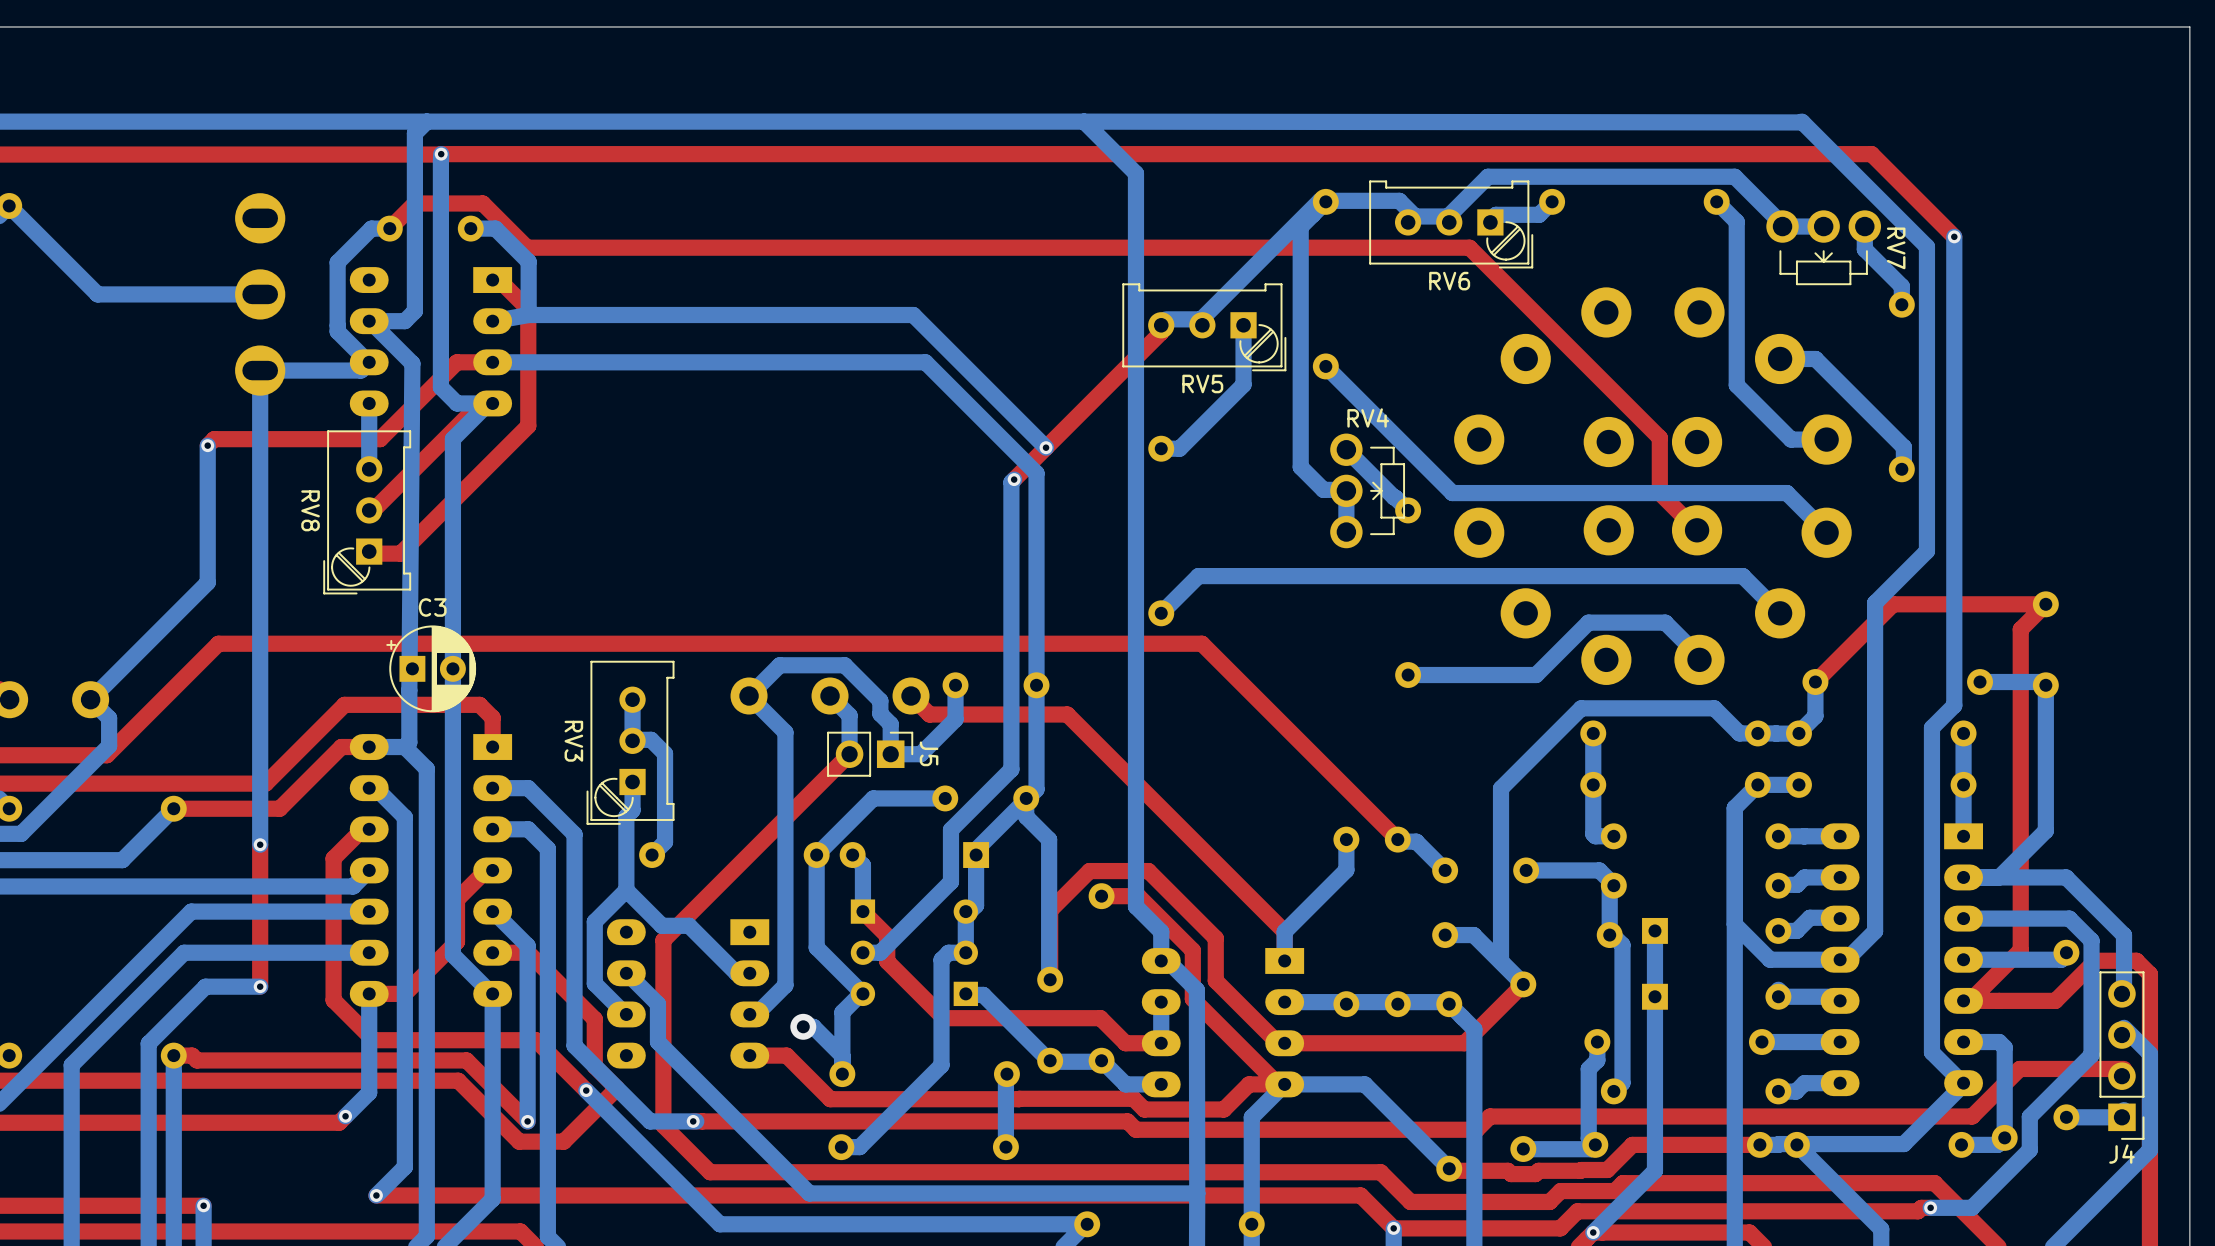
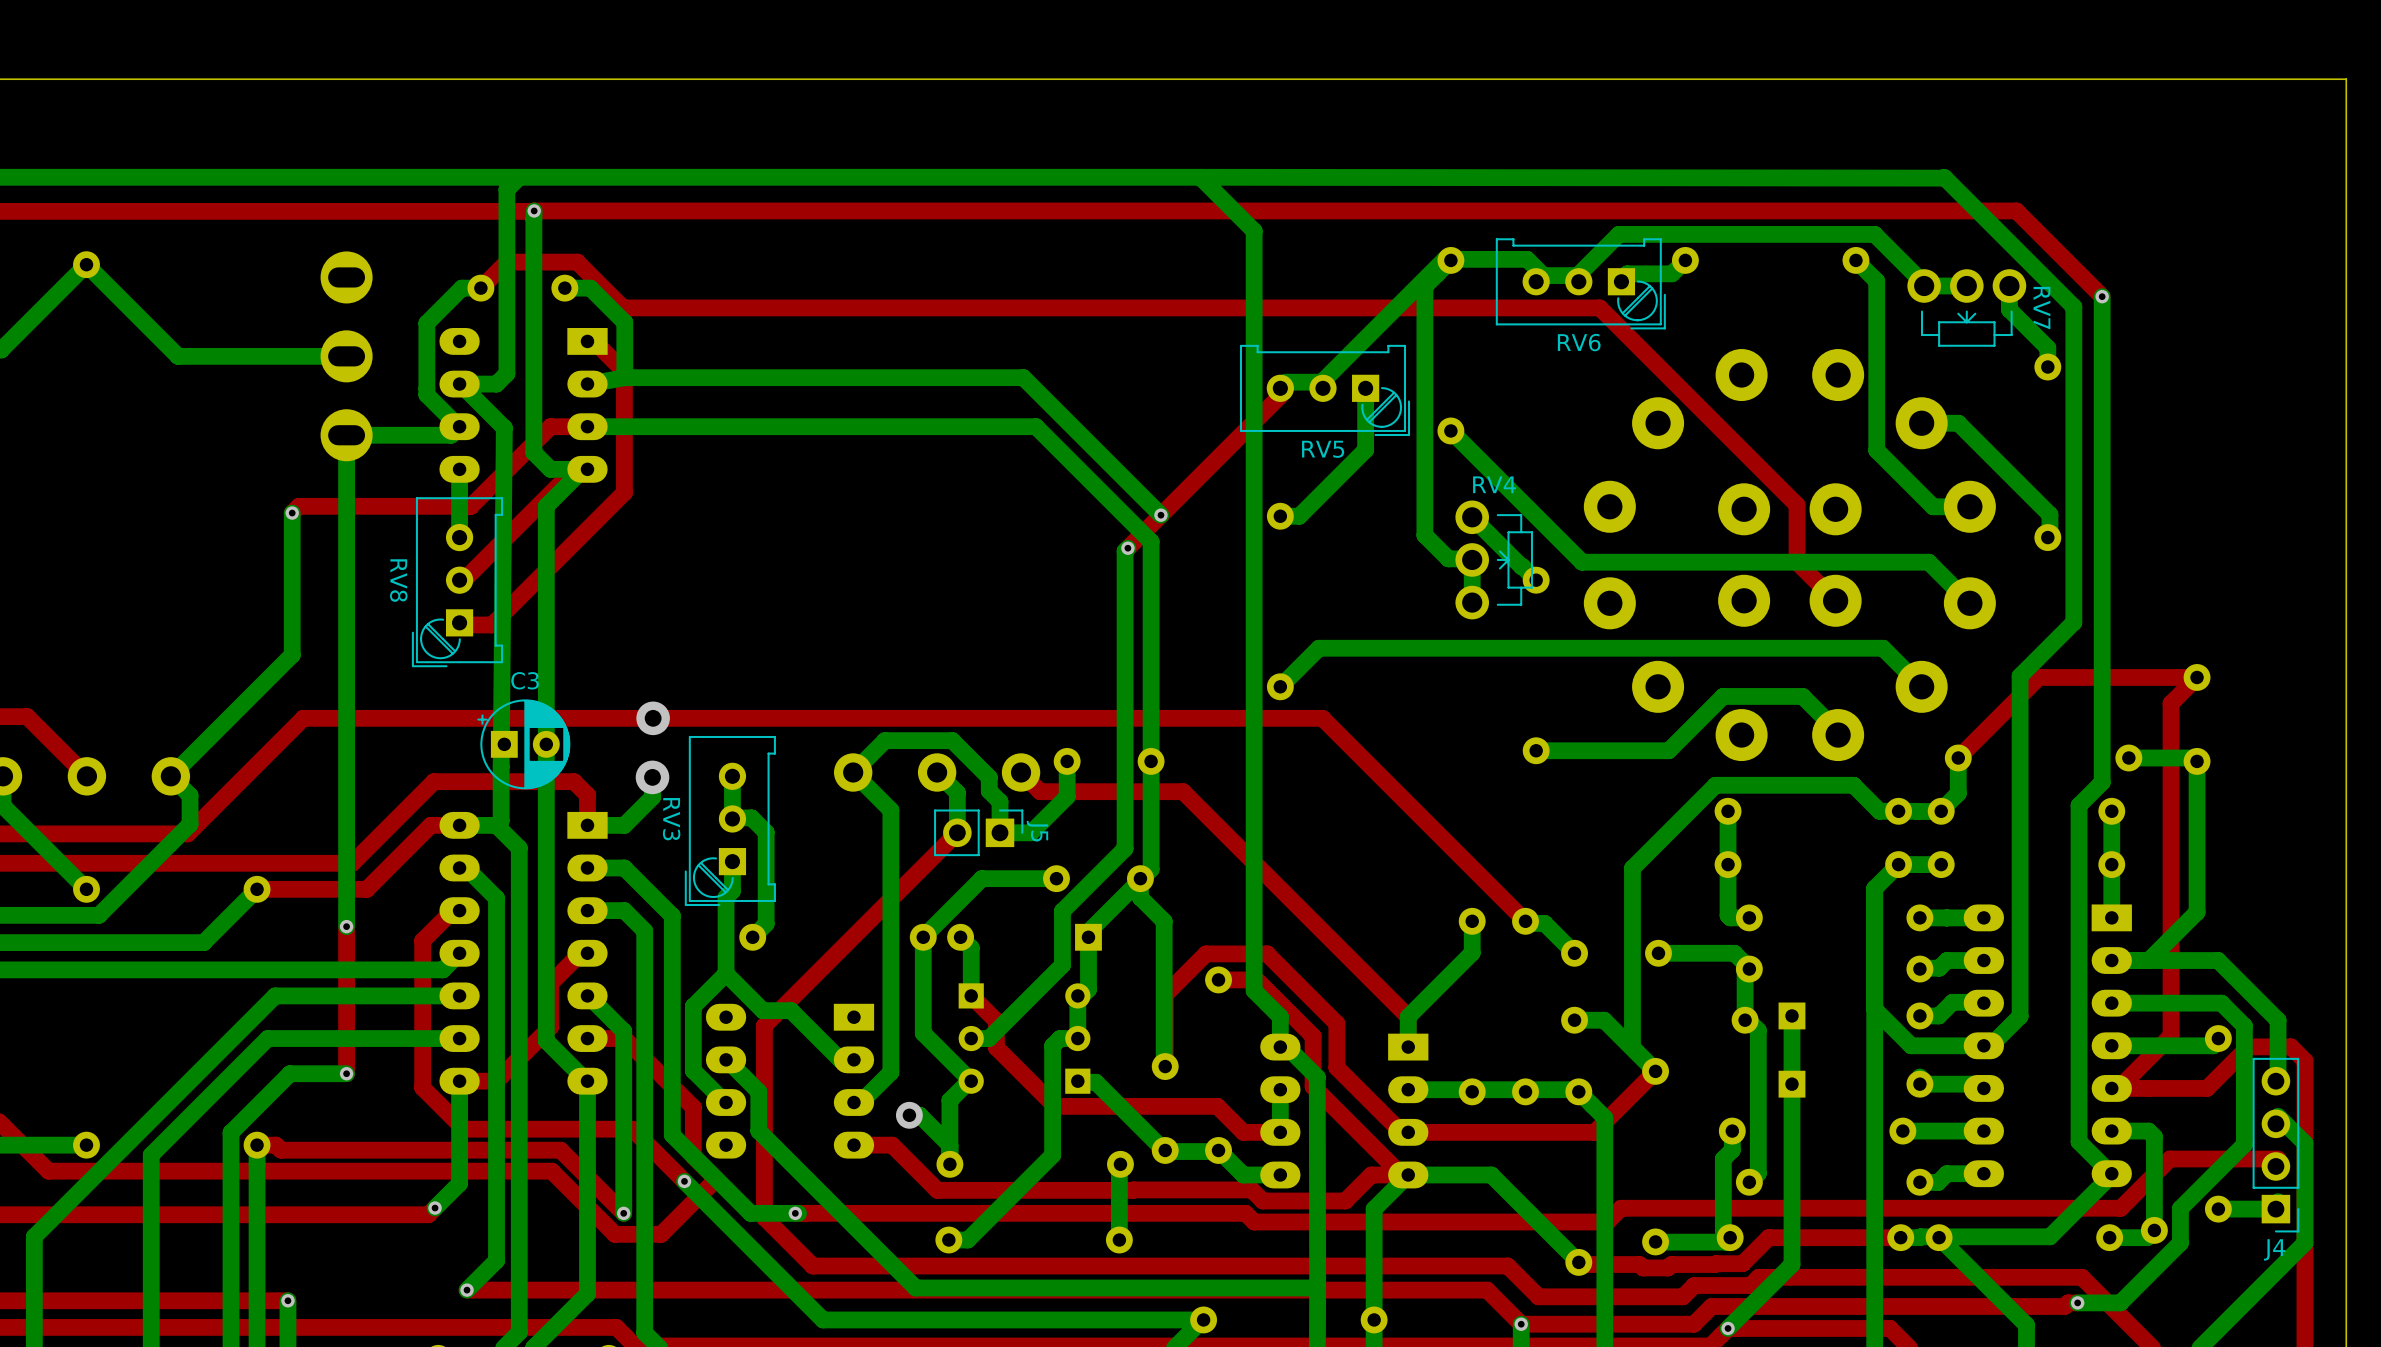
via: none -> (653, 718)
bottom track: none -> (652, 777) (652, 797) (624, 825) (587, 825)
via: none -> (652, 777)

